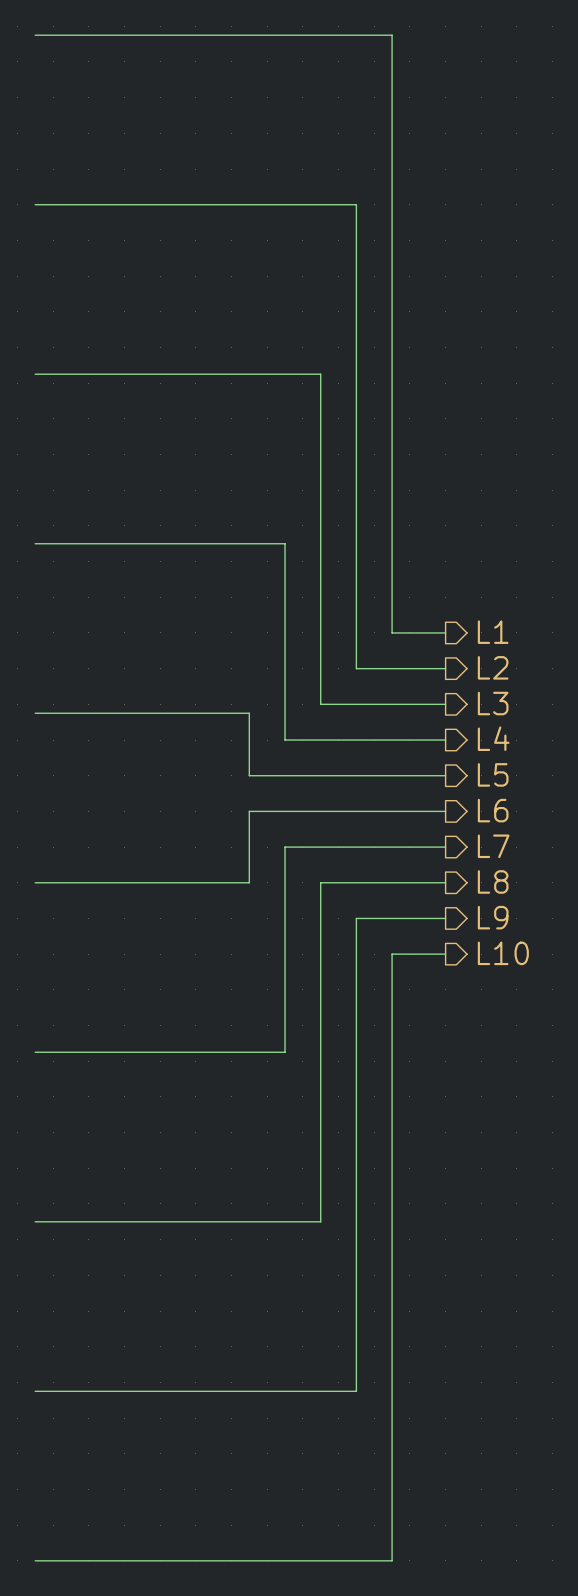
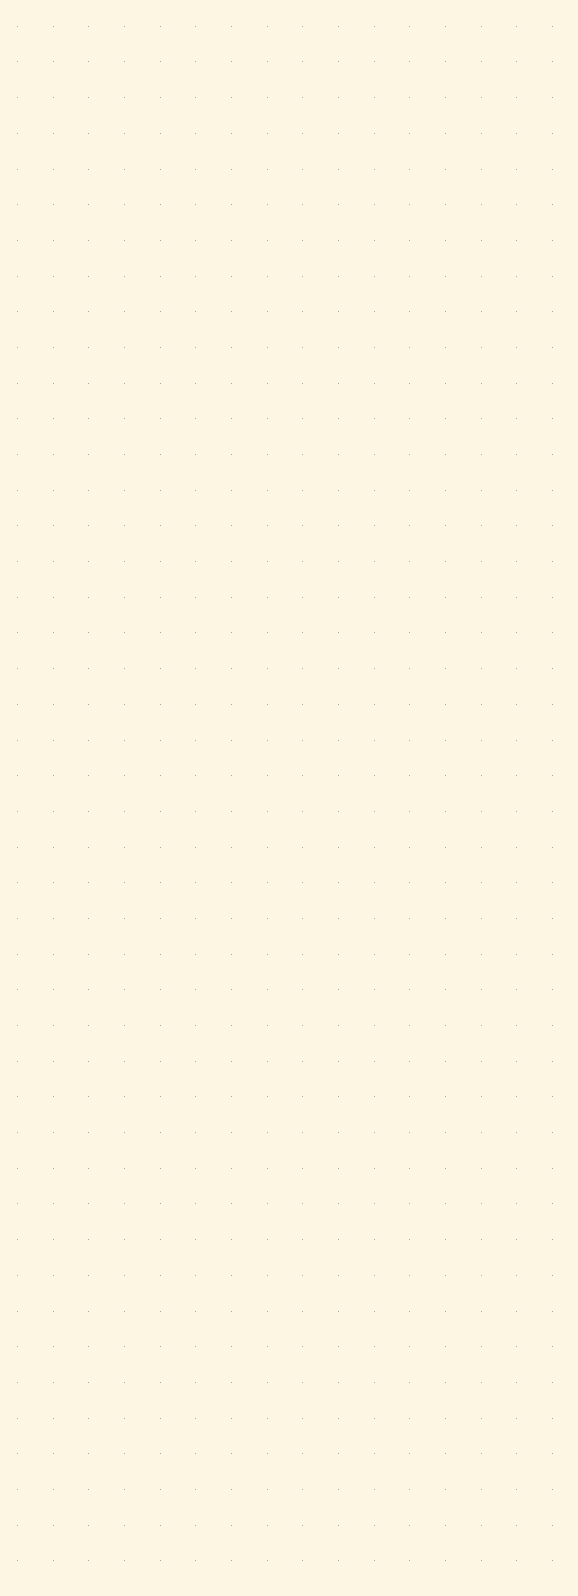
wire: (35, 35) (392, 35) (392, 632) (445, 632) -> none
wire: (35, 204) (356, 204) (356, 668) (445, 668) -> none
wire: (35, 374) (320, 374) (320, 704) (445, 704) -> none
wire: (35, 543) (285, 543) (285, 740) (445, 740) -> none
hierarchical label: L1 (493, 632) -> none
hierarchical label: L2 (493, 667) -> none
hierarchical label: L3 (493, 703) -> none
wire: (35, 713) (249, 713) (249, 775) (445, 775) -> none
hierarchical label: L4 (493, 738) -> none
hierarchical label: L5 (493, 774) -> none
hierarchical label: L6 (493, 810) -> none
wire: (445, 811) (249, 811) (249, 882) (35, 882) -> none
hierarchical label: L7 (493, 846) -> none
wire: (445, 847) (285, 847) (285, 1052) (35, 1052) -> none
hierarchical label: L8 (493, 881) -> none
wire: (445, 882) (320, 882) (320, 1221) (35, 1221) -> none
hierarchical label: L9 (493, 917) -> none
wire: (445, 918) (356, 918) (356, 1391) (35, 1391) -> none
hierarchical label: L10 (503, 953) -> none
wire: (445, 954) (392, 954) (392, 1560) (35, 1560) -> none

